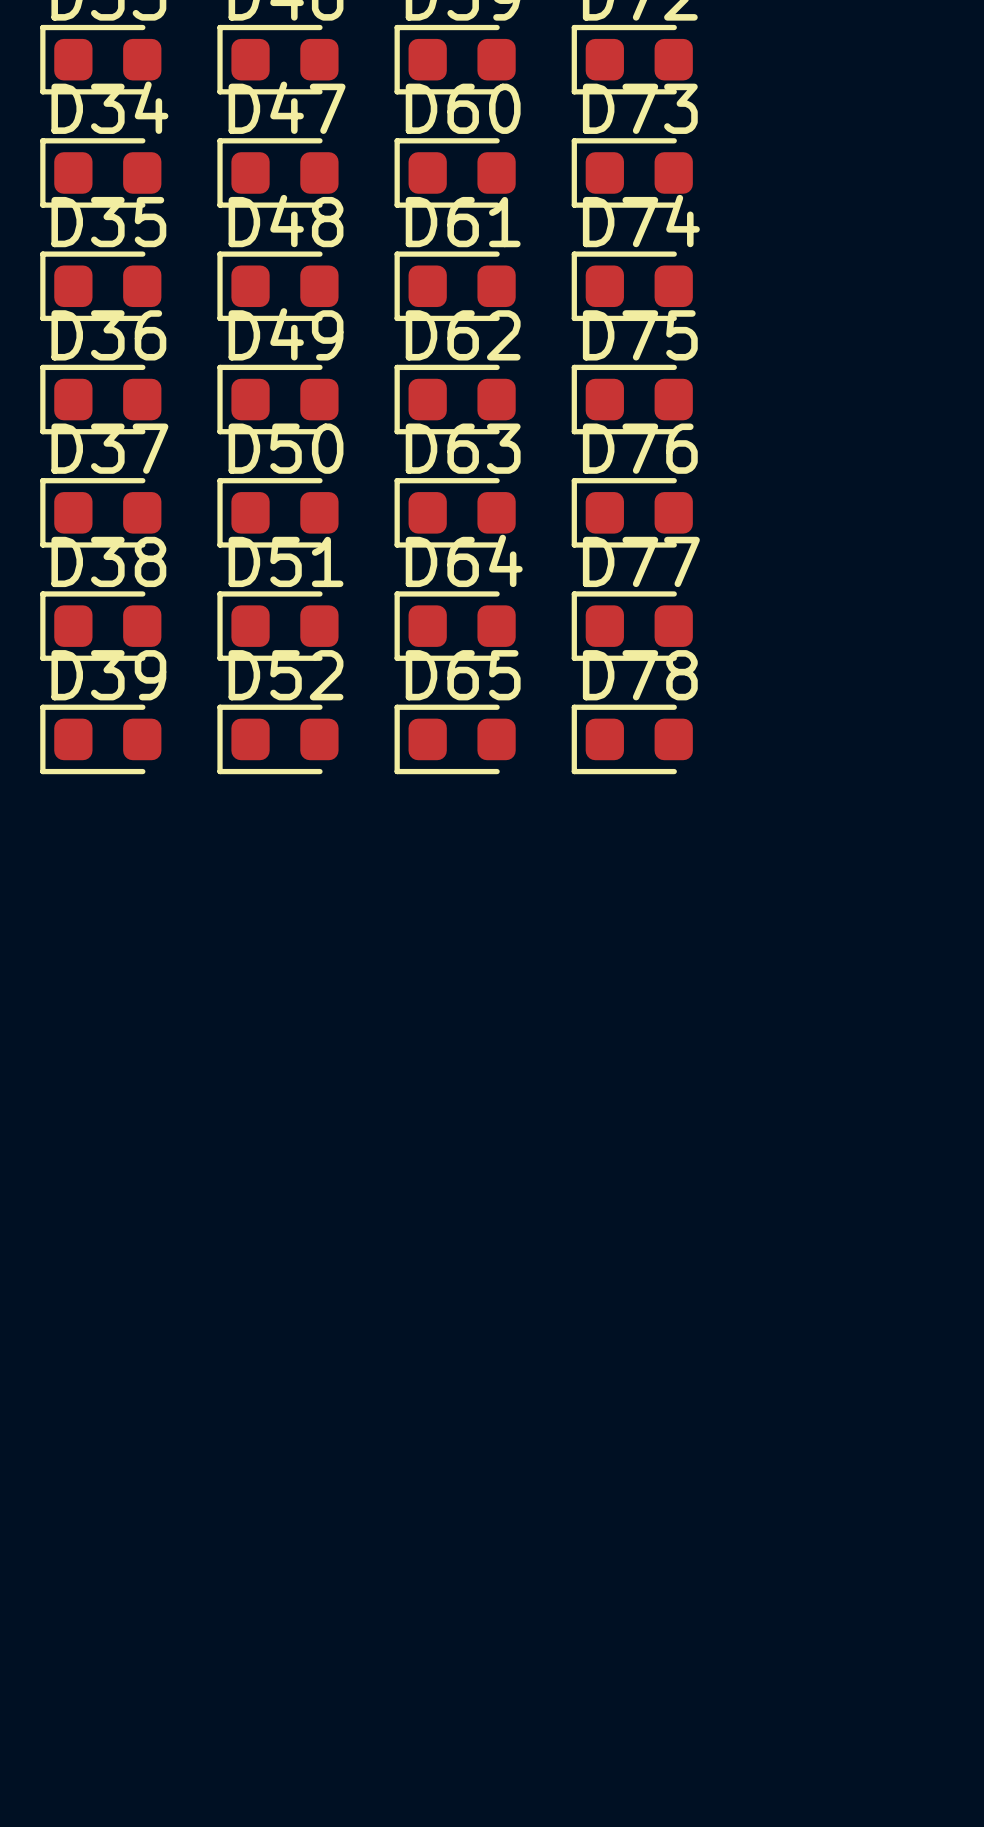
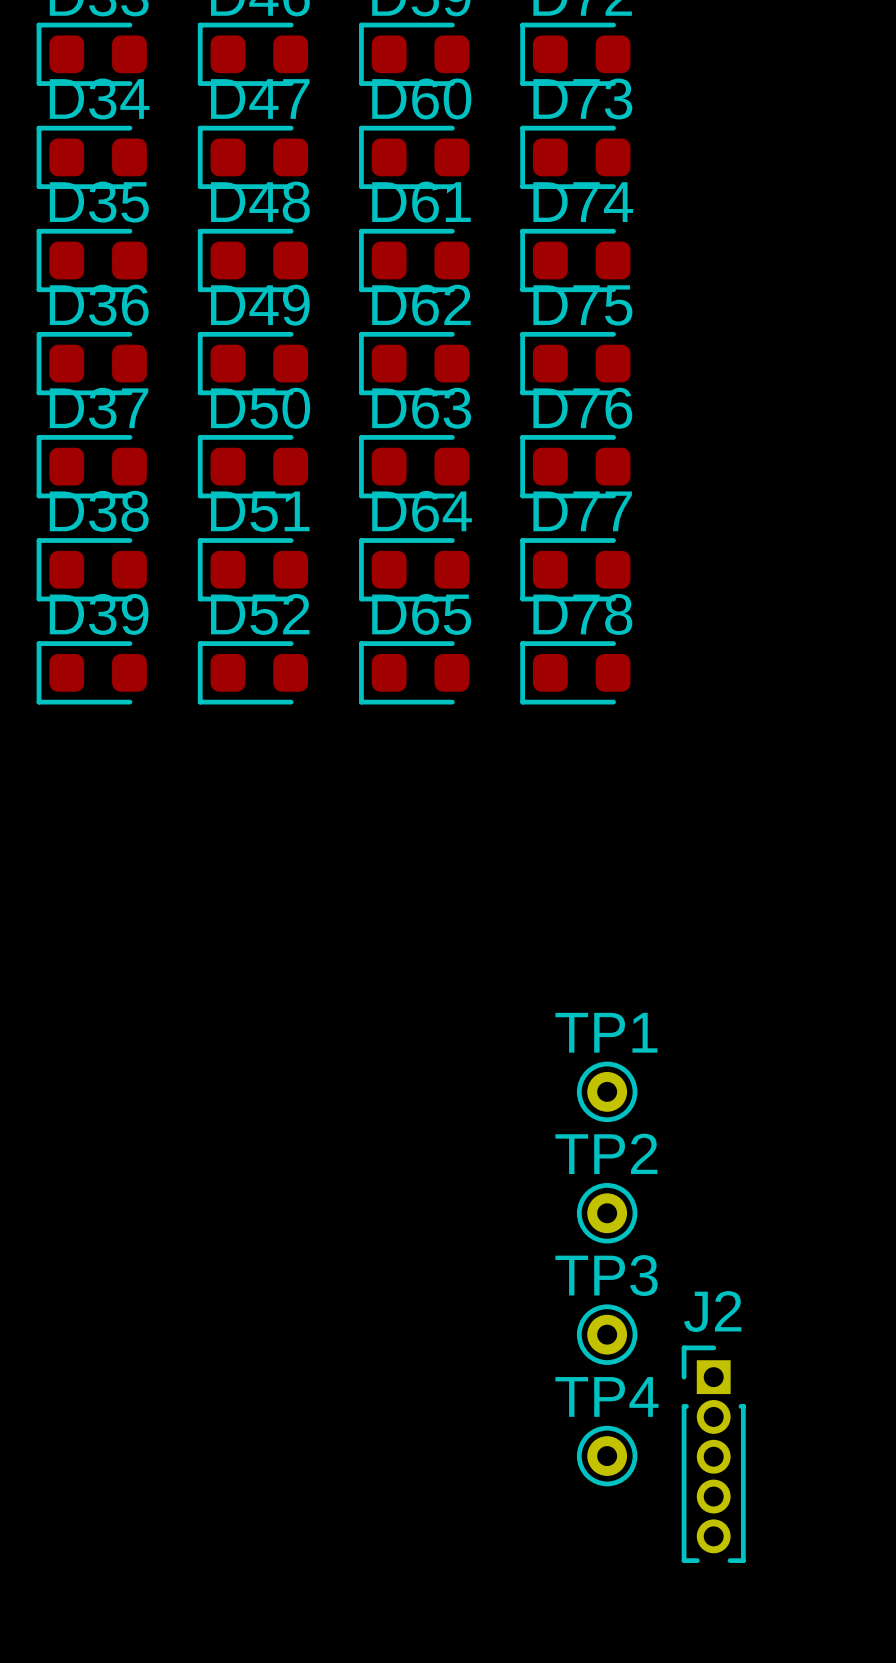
TP1: none -> (607, 1091)
TP2: none -> (607, 1213)
TP3: none -> (607, 1334)
J2: none -> (713, 1454)
TP4: none -> (607, 1456)

